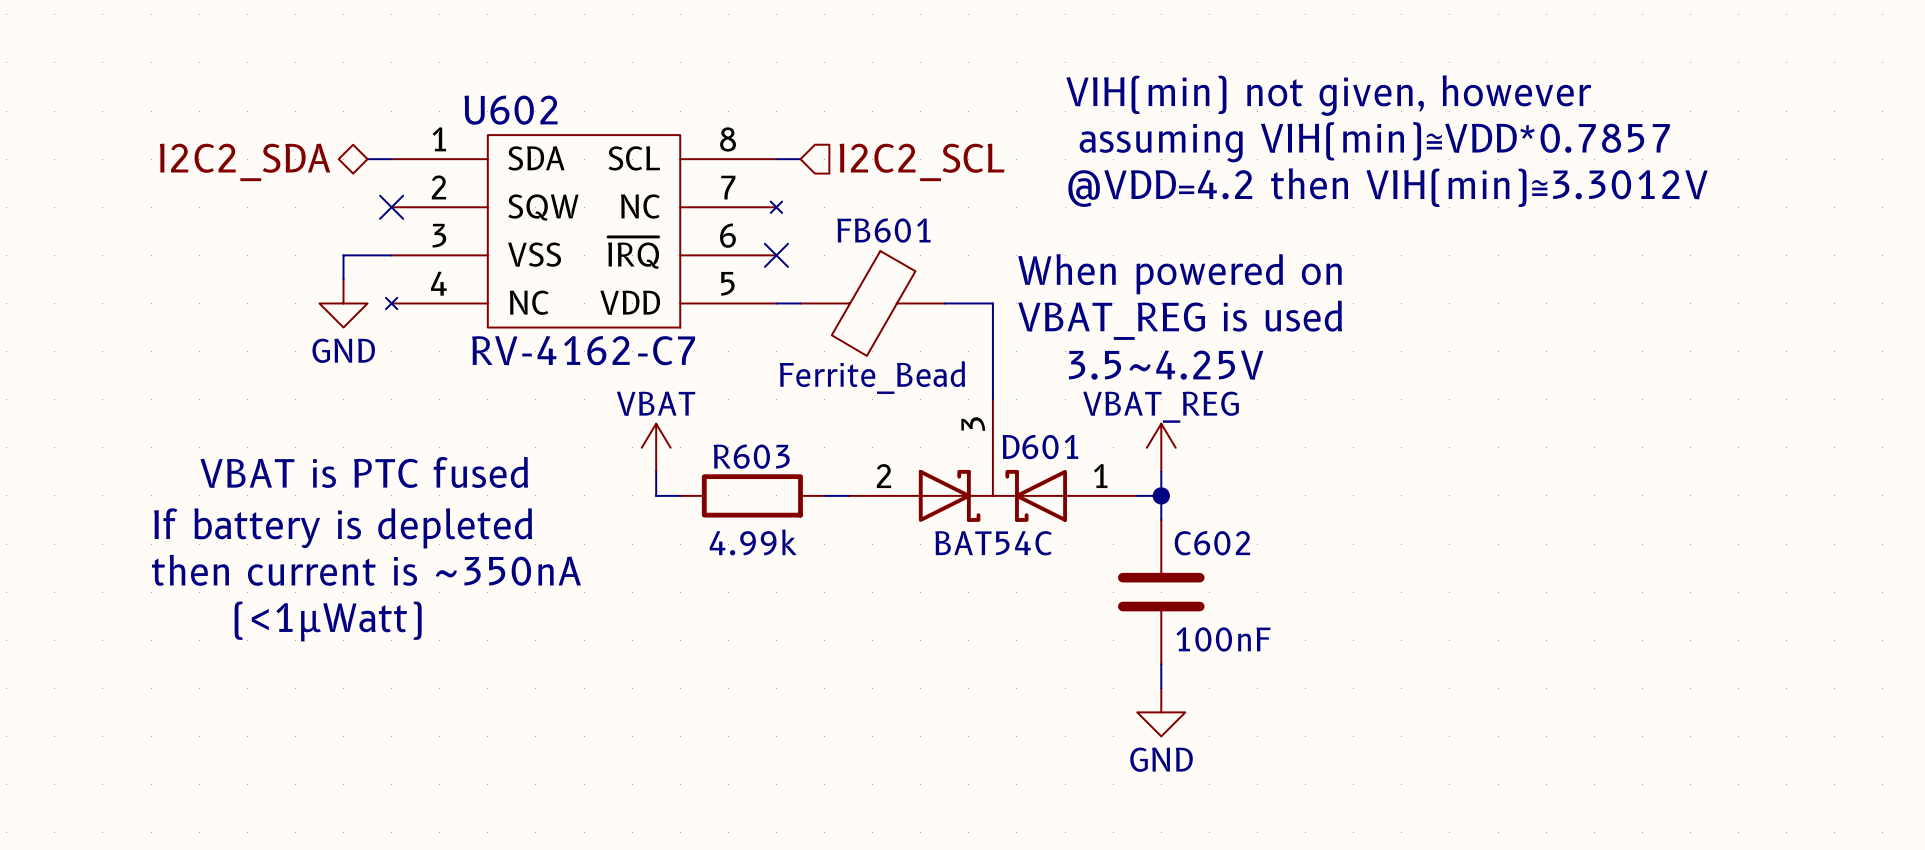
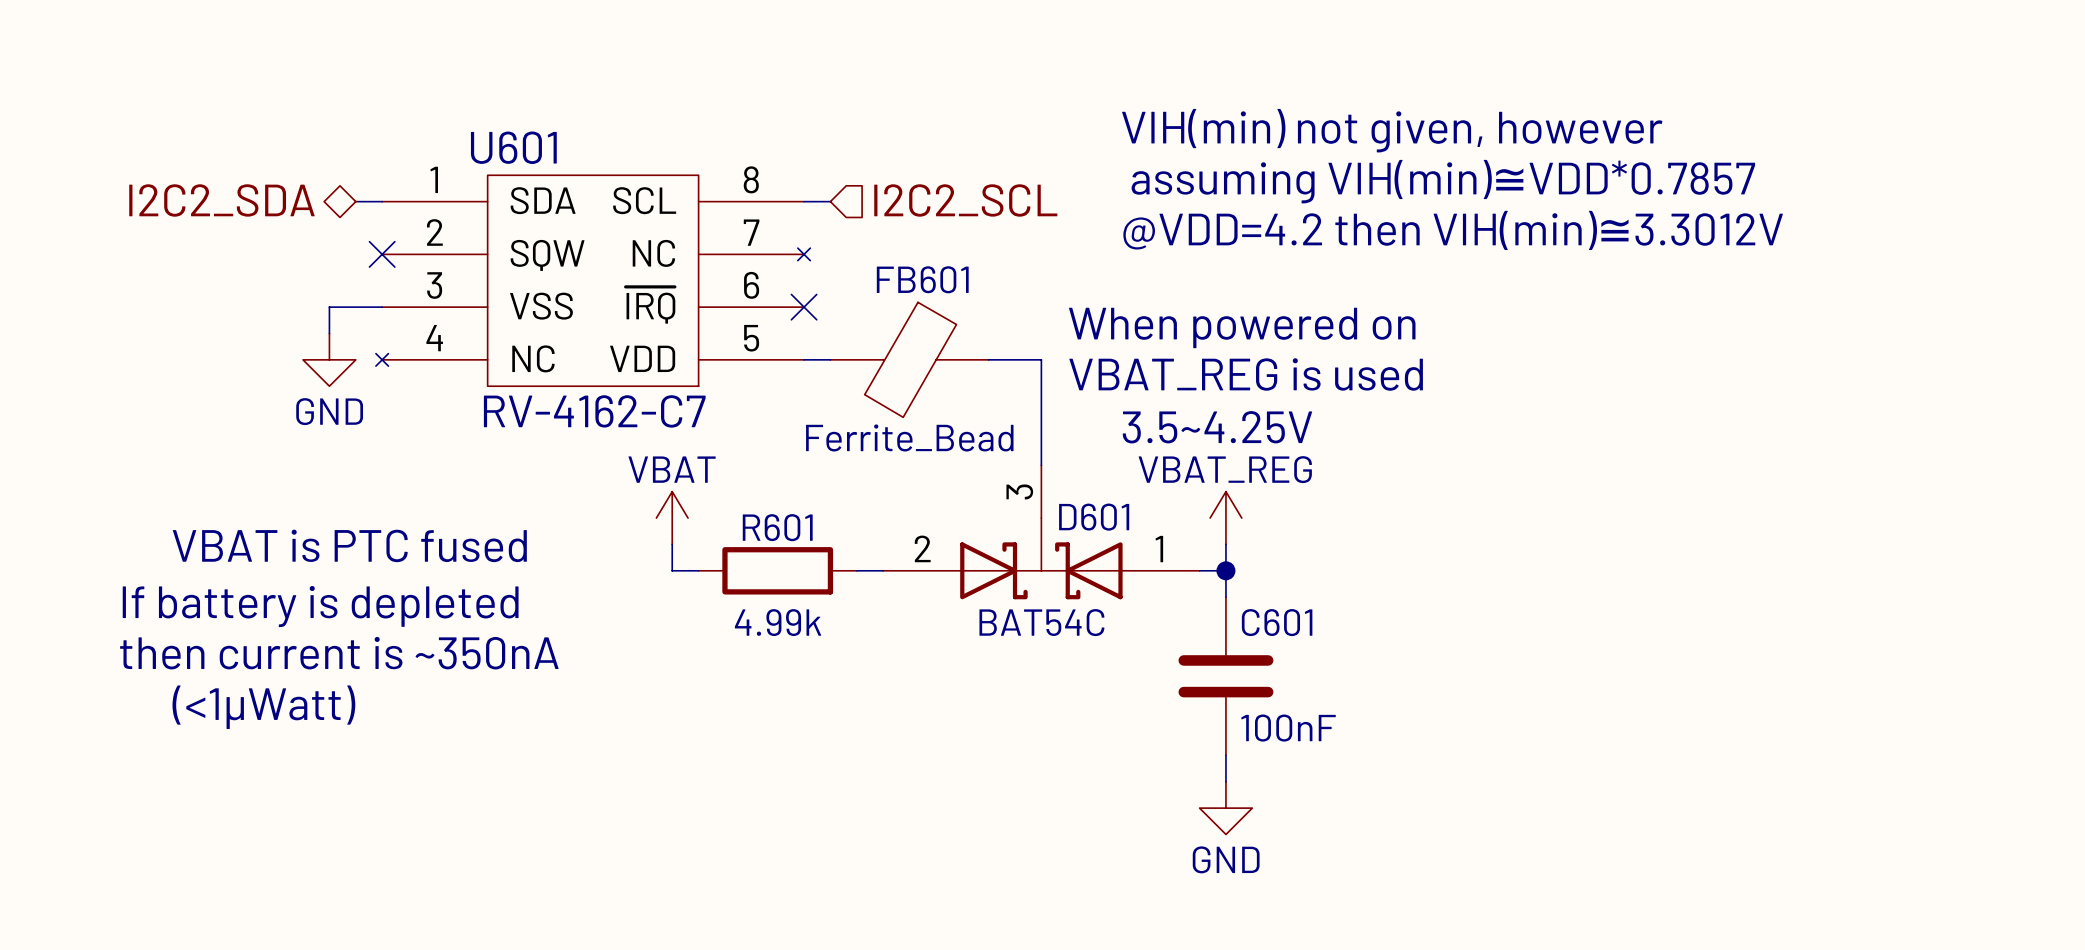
U602 name: U602 (510, 110) -> U601 (513, 147)
R603 name: R603 (751, 456) -> R601 (777, 527)
C602 name: C602 (1212, 543) -> C601 (1277, 622)

